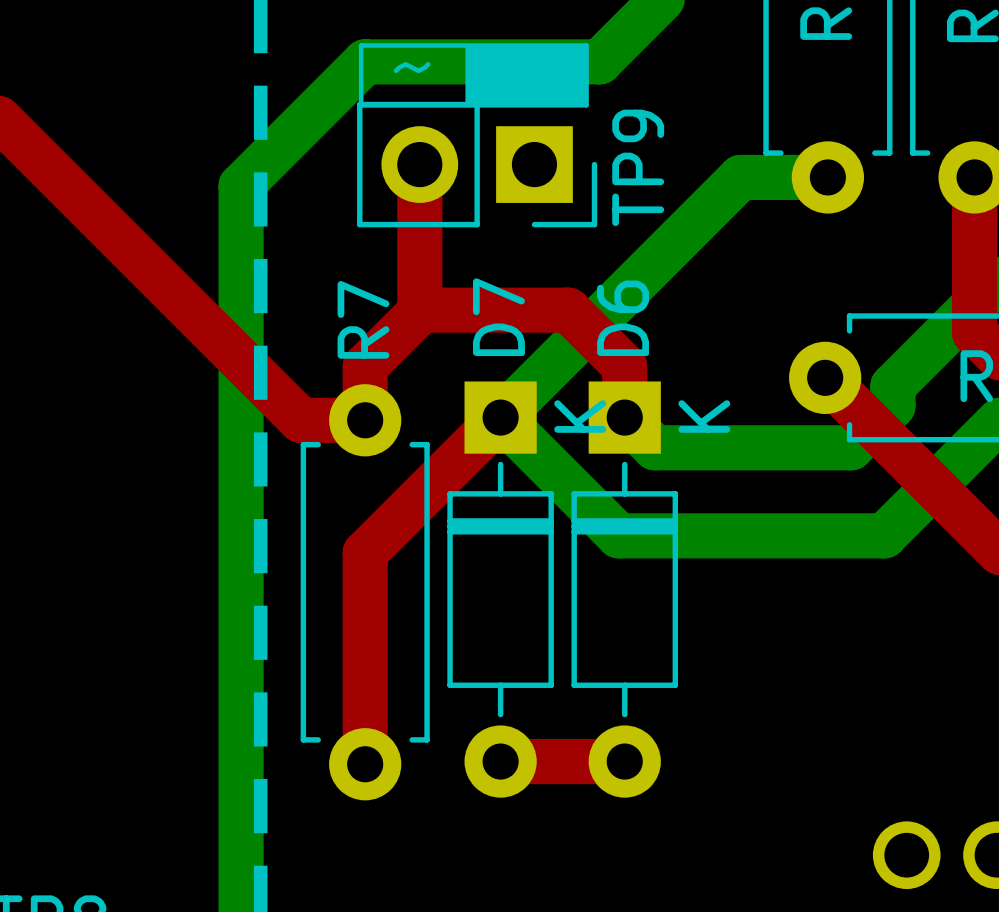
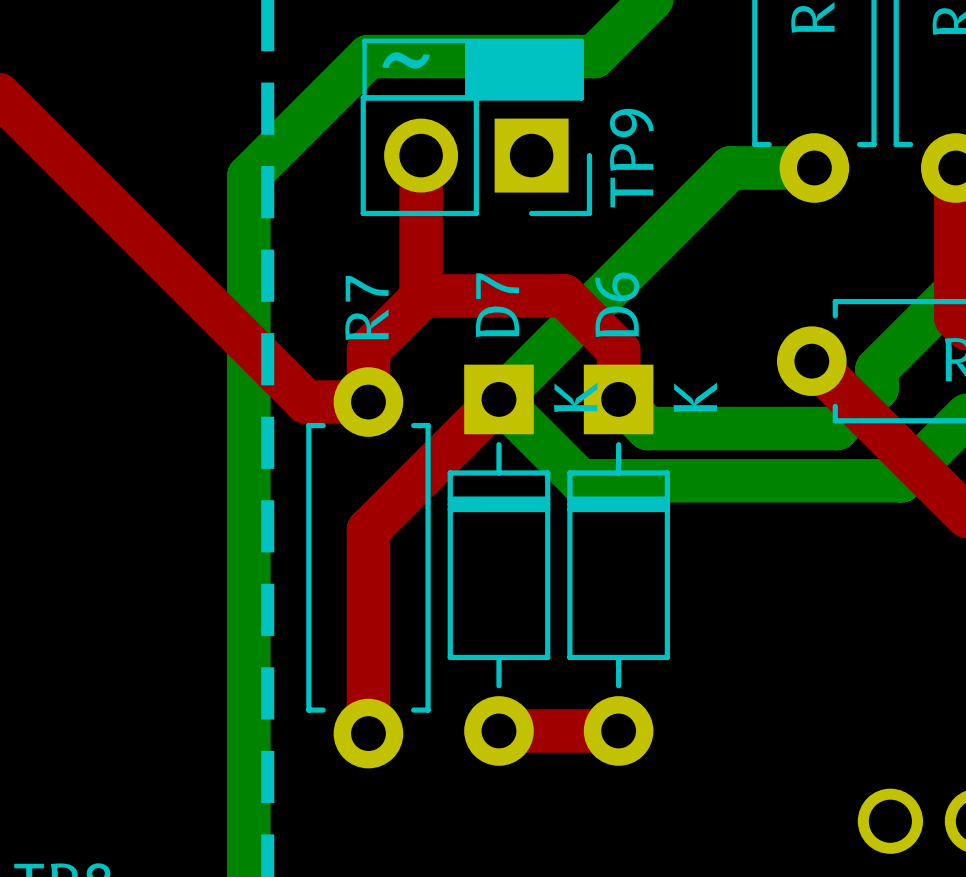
bottom track: (585, 501) (618, 535) (884, 535) (918, 501) -> (580, 480) (901, 480)

